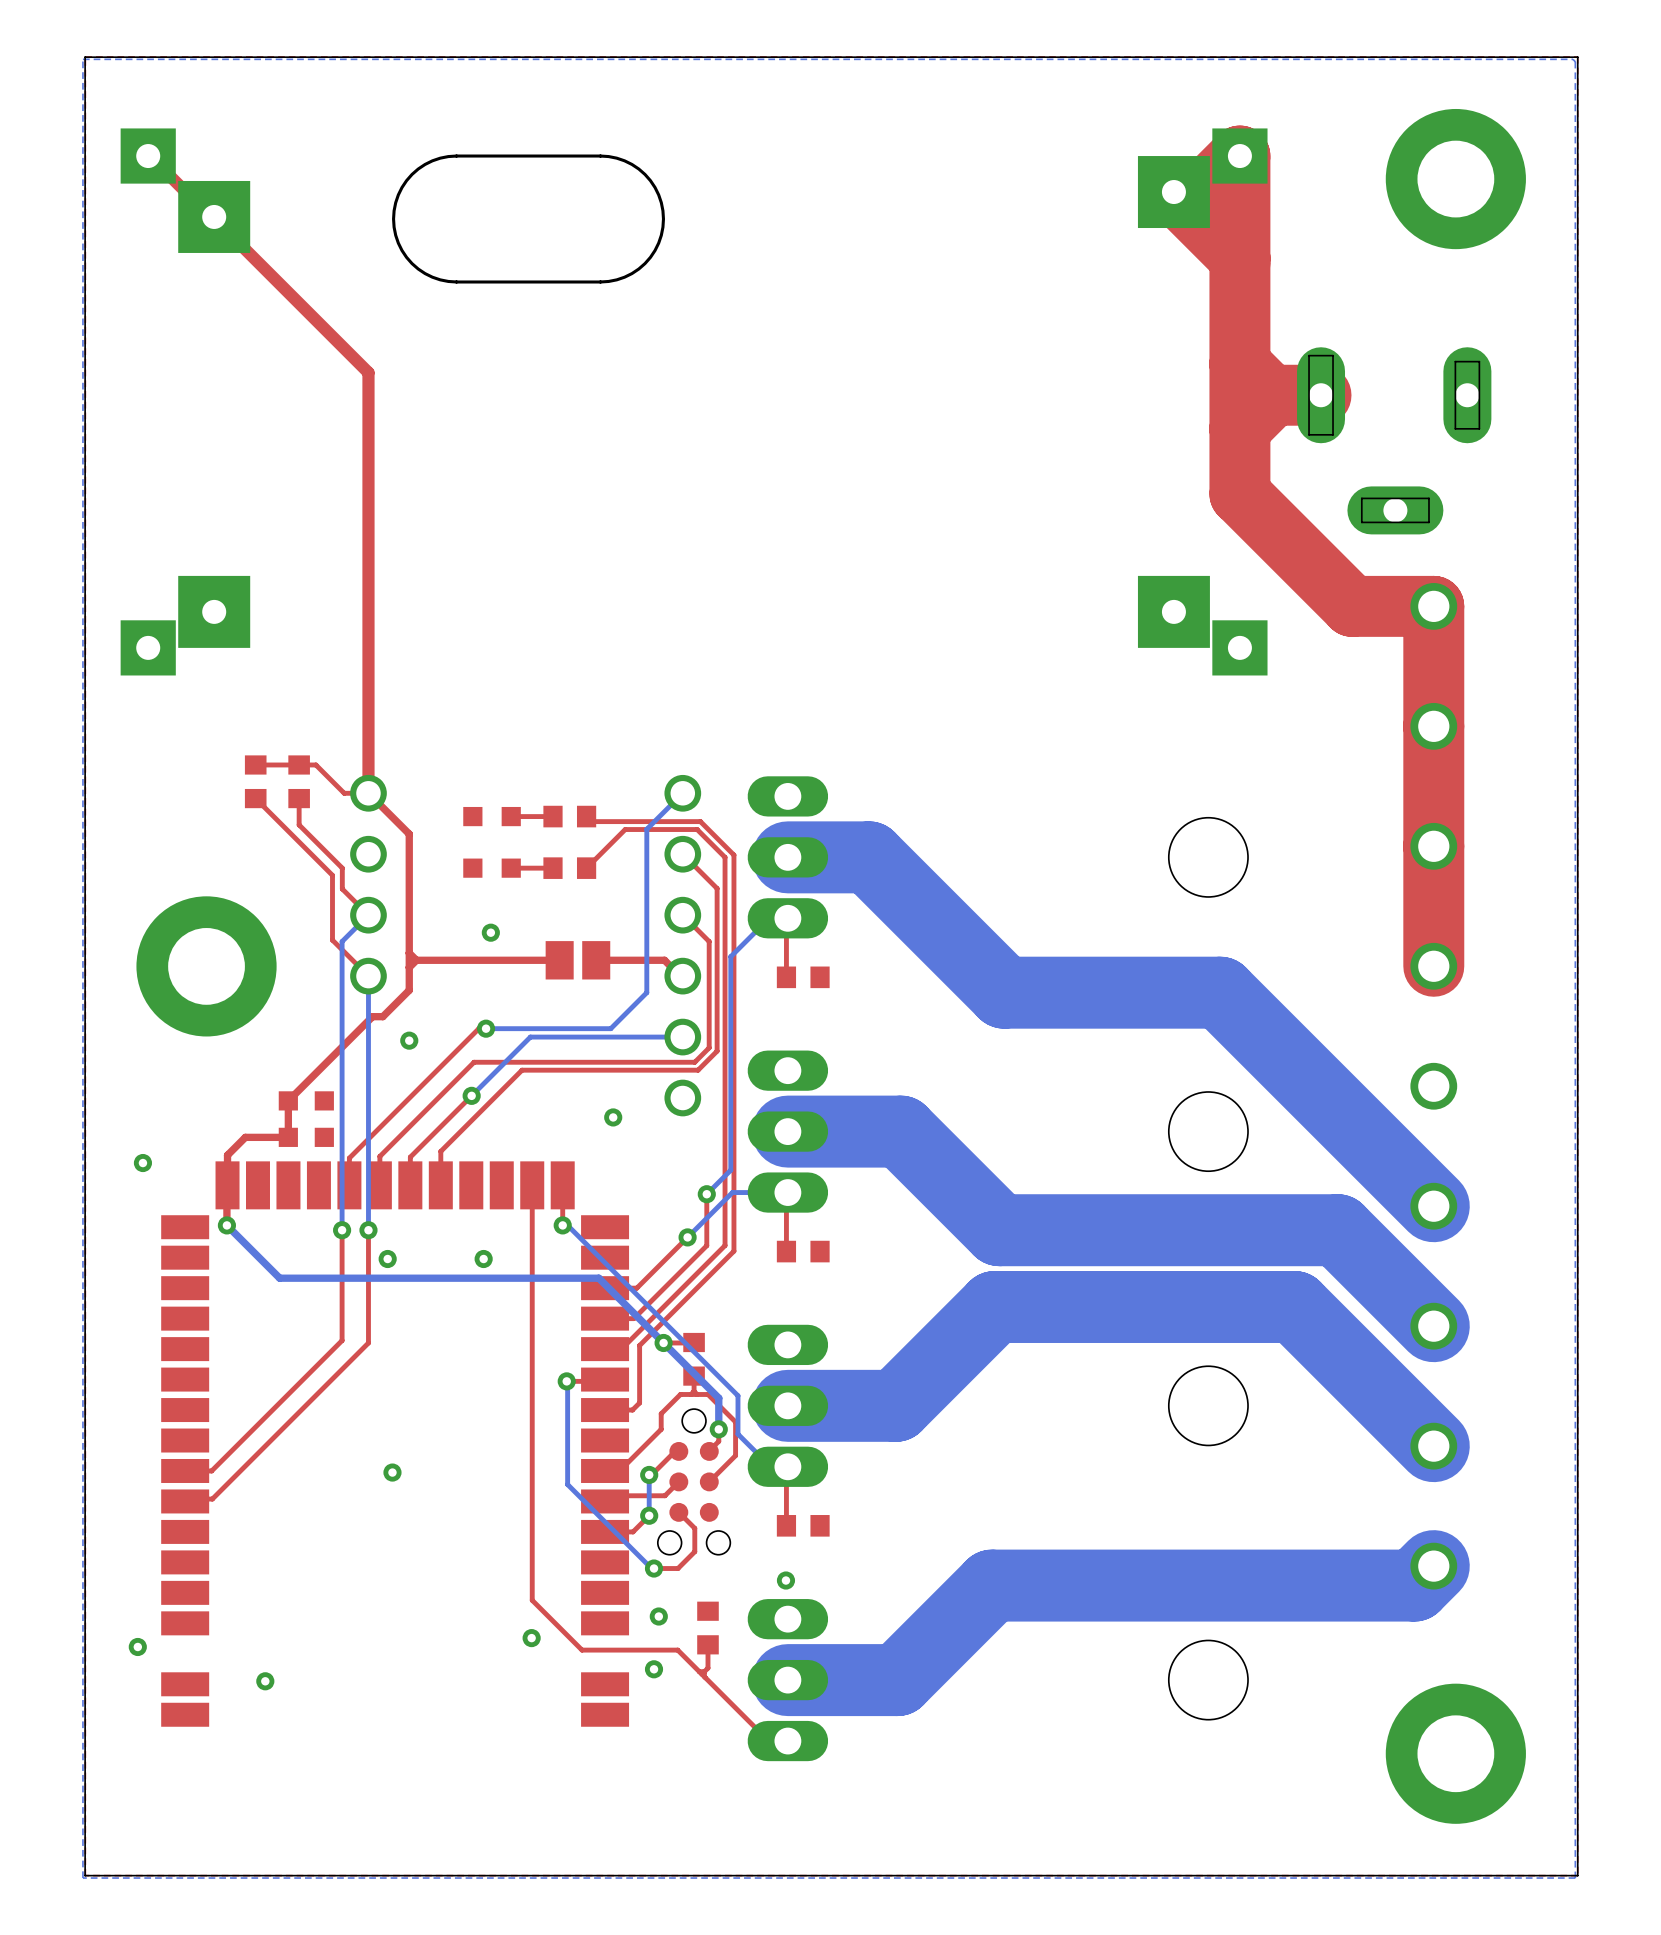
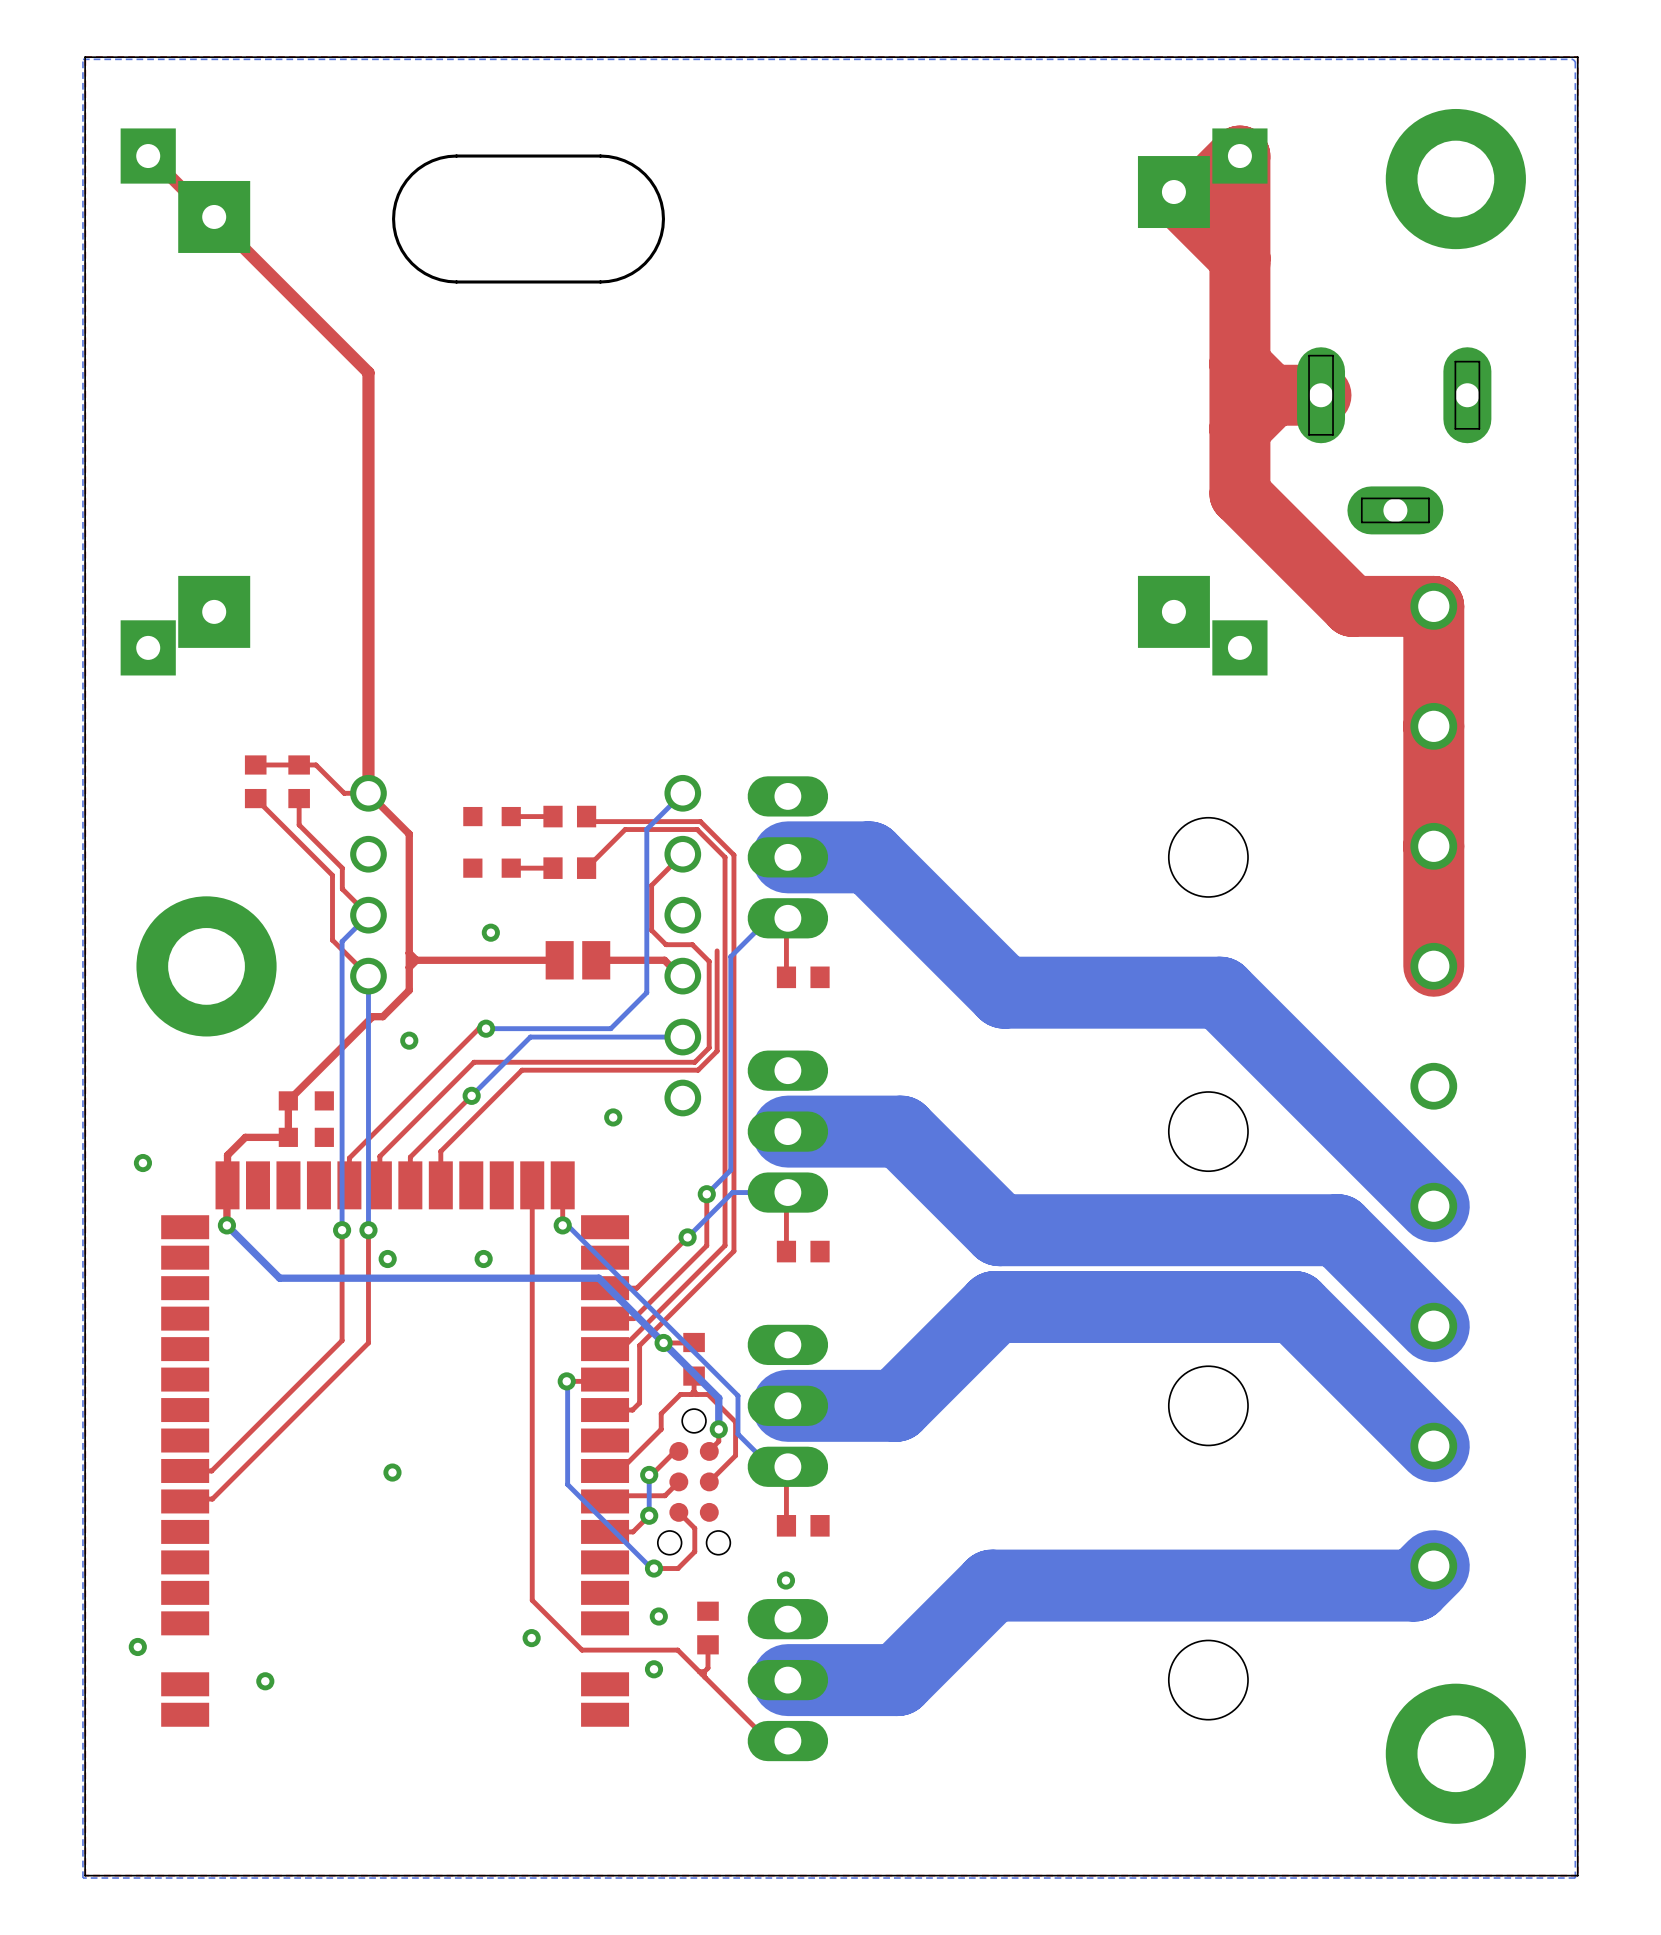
top track: (682, 854) (717, 888) (717, 950) -> (682, 854) (651, 885) (651, 930) (666, 944) (692, 944) (709, 961)
top track: (682, 915) (709, 941) (709, 961) -> none

